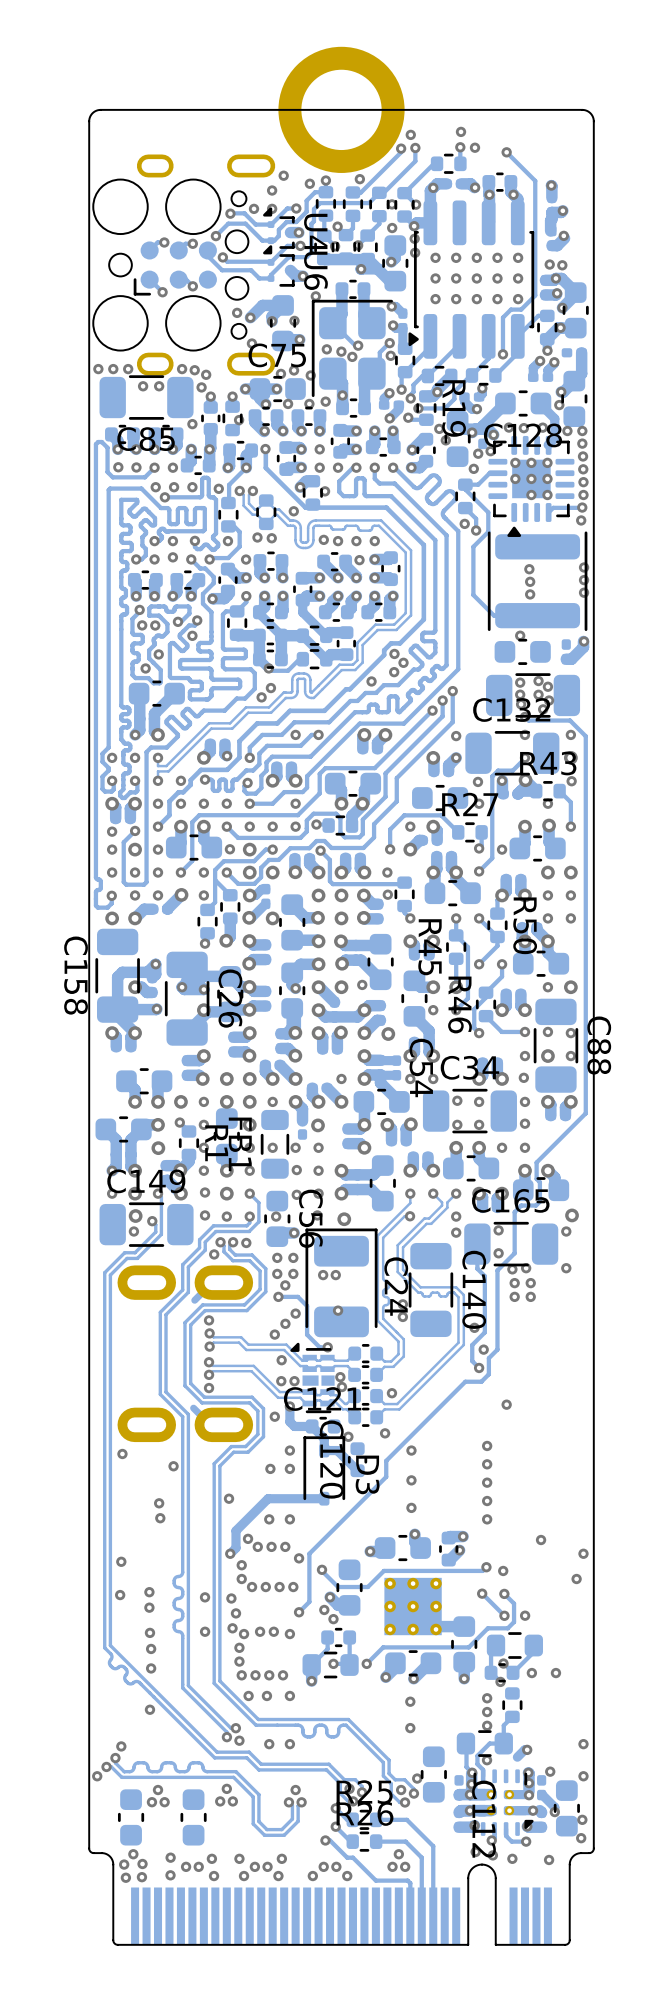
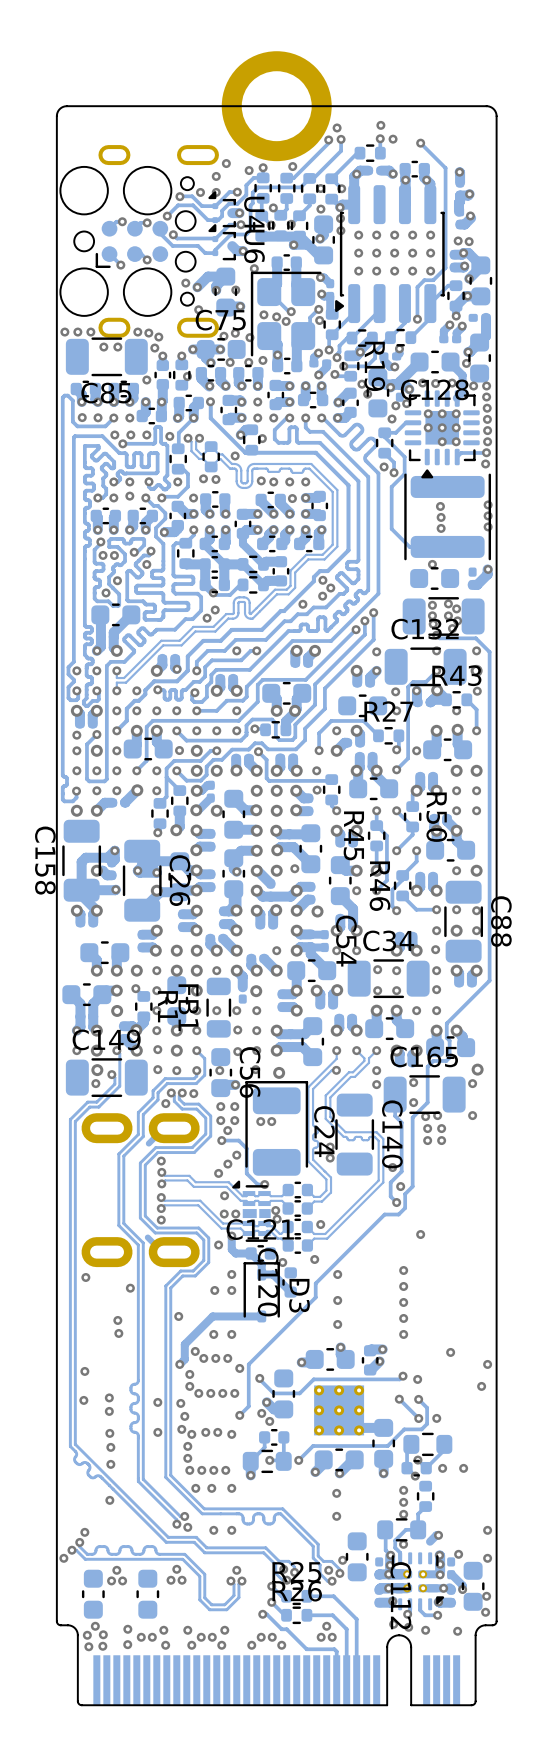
via: (338, 1310) -> none

